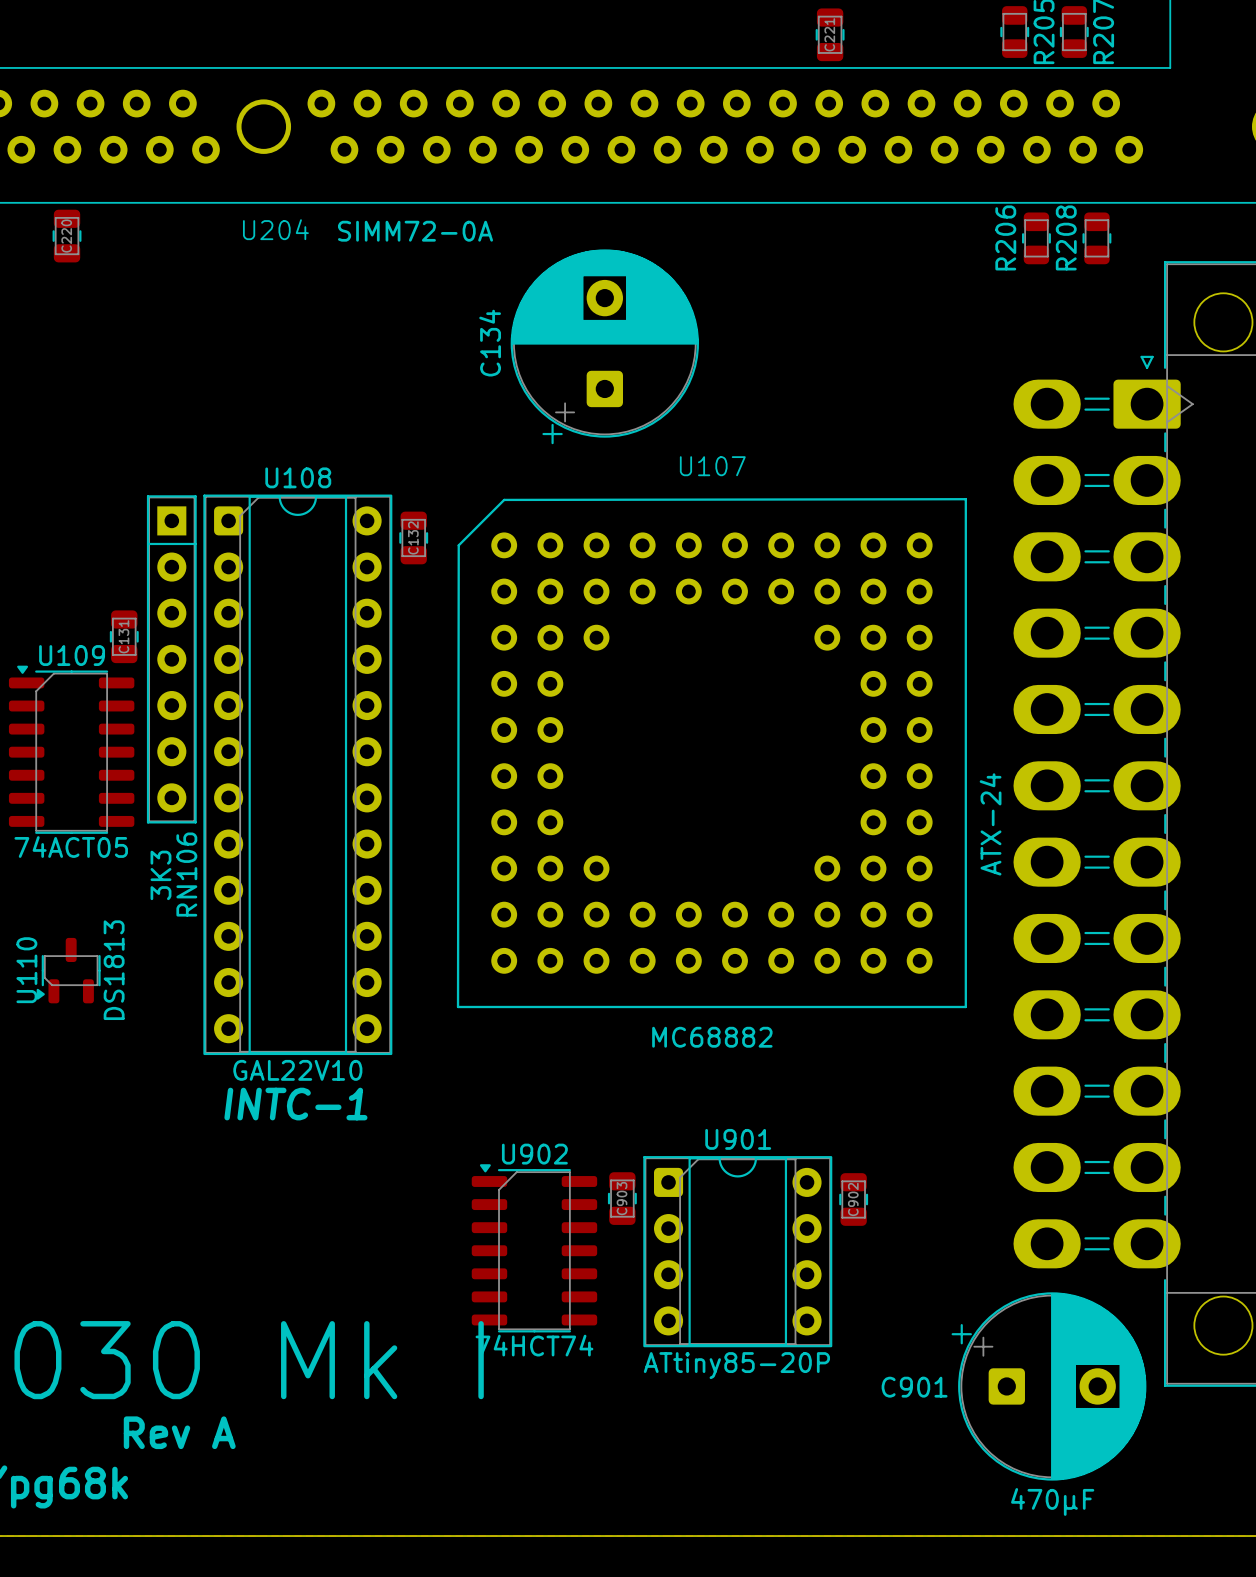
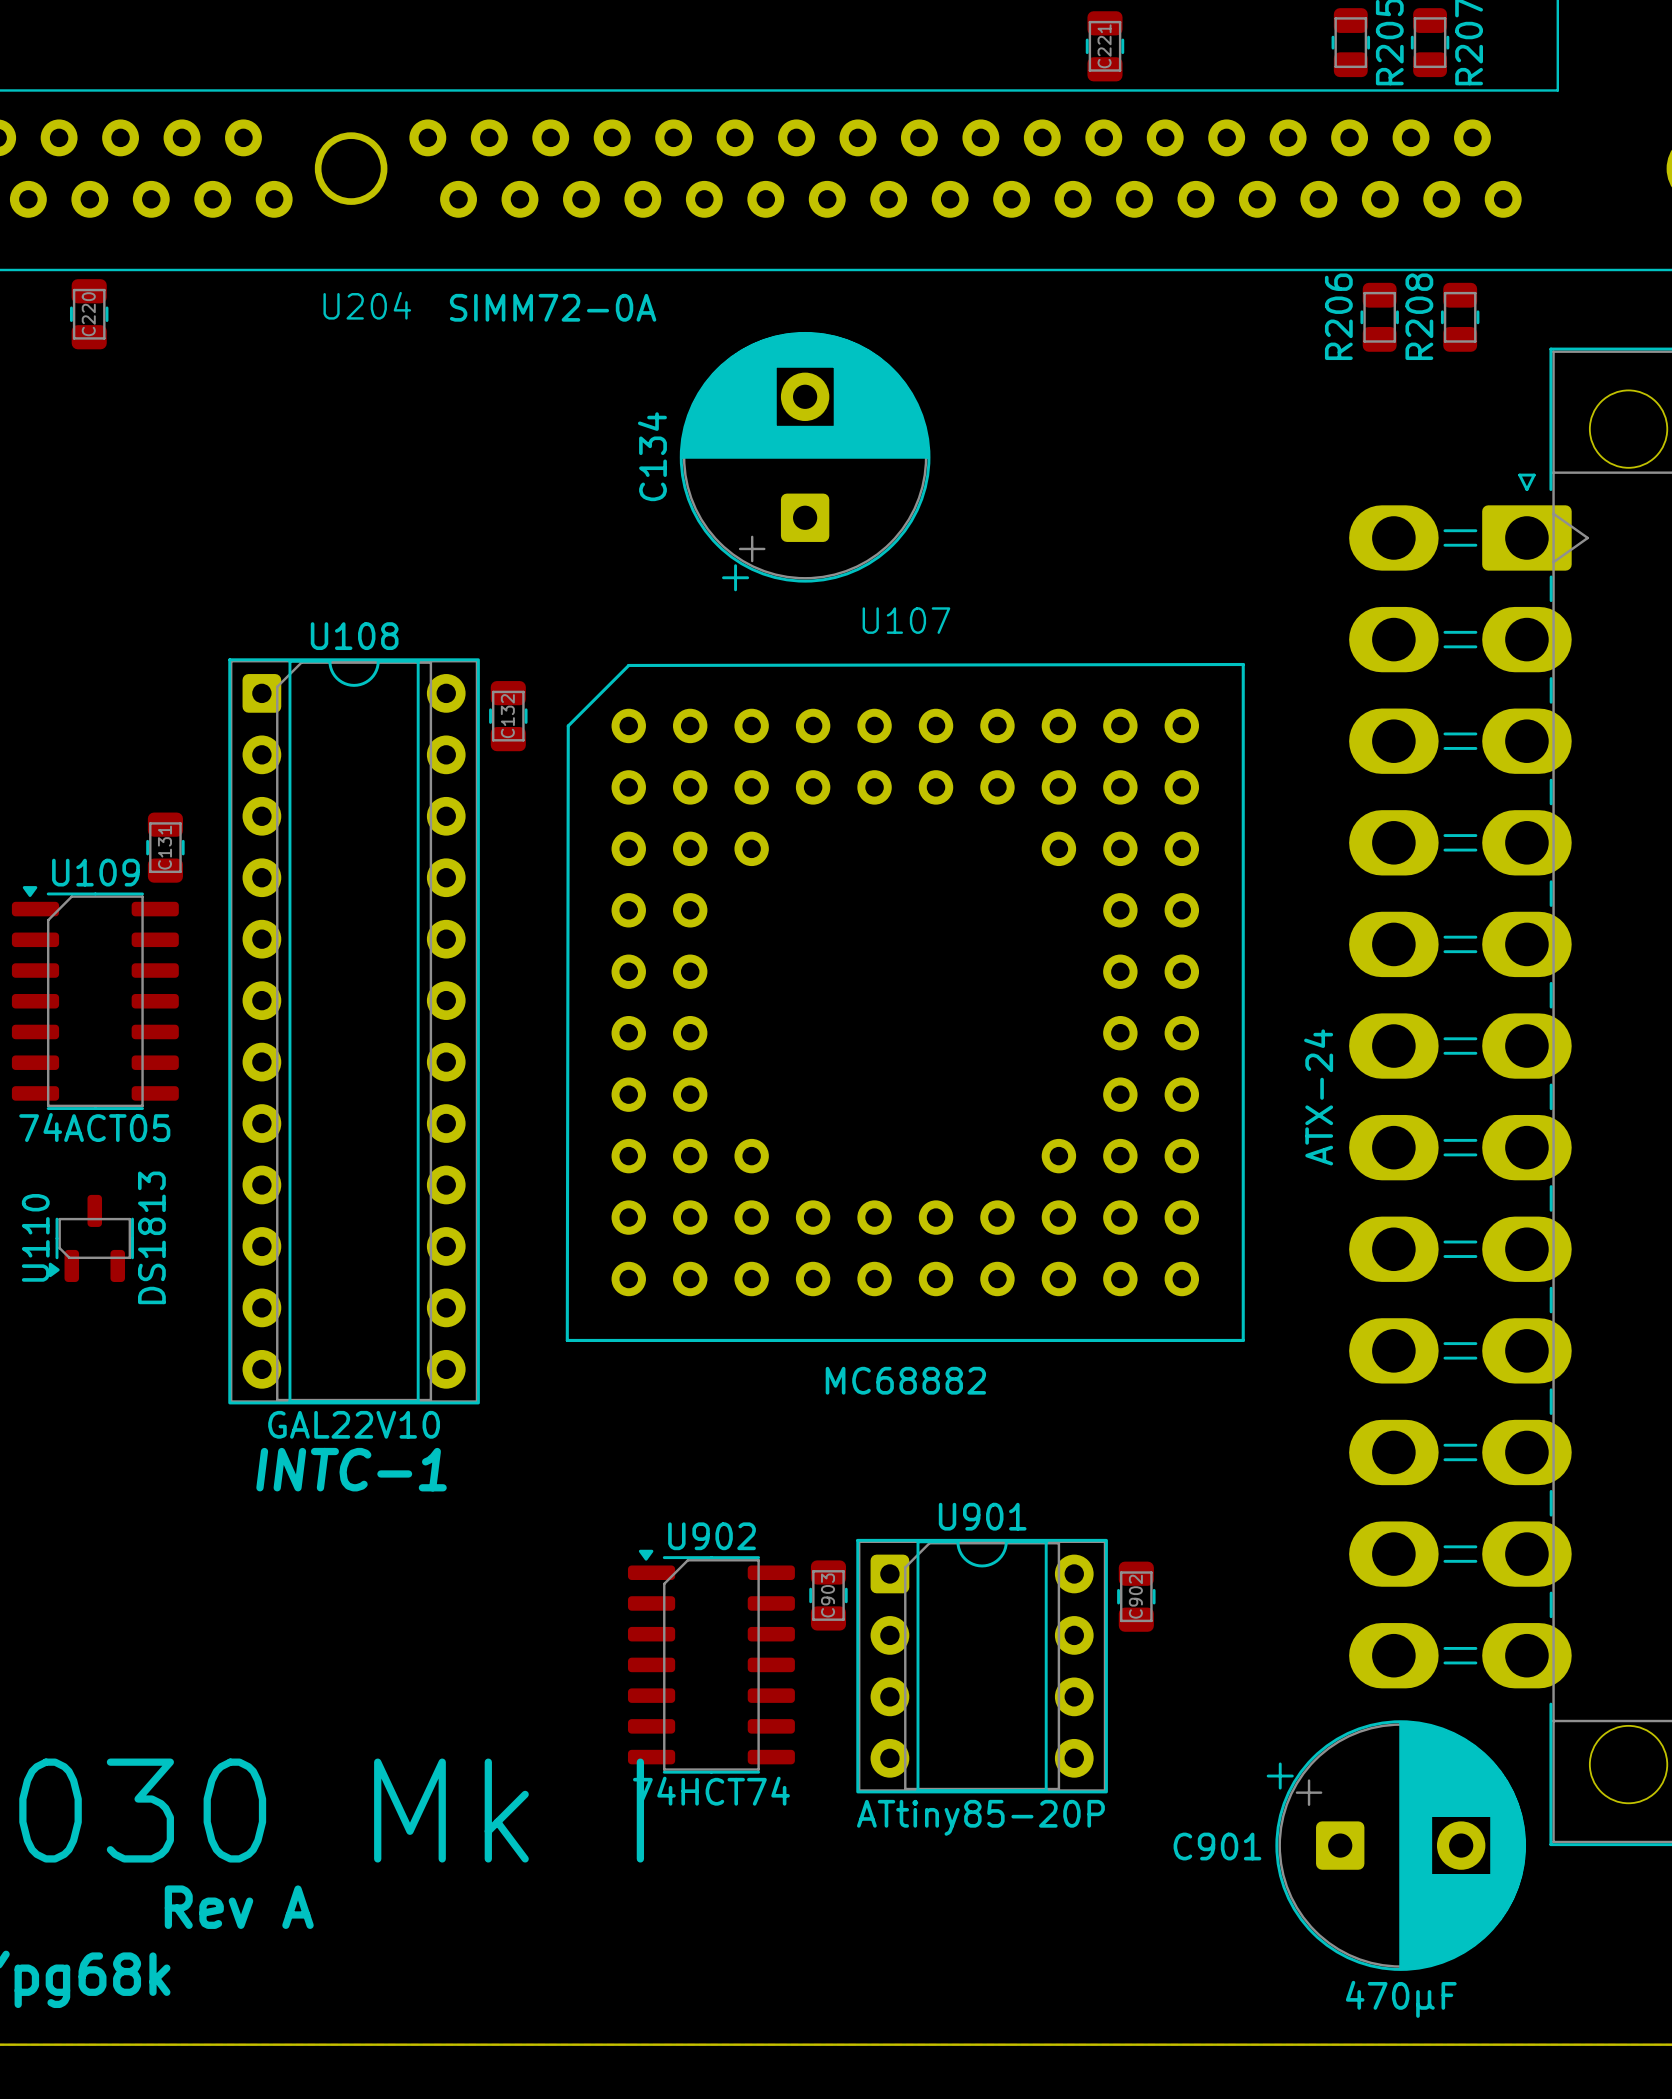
C132 position: (413, 537) -> (508, 716)
RN106: 3K3 (171, 659) -> none
U107 position: (711, 753) -> (905, 1002)
U108 position: (297, 774) -> (354, 1031)
U110 position: (68, 970) -> (91, 1238)
text position: INTC-1 (295, 1104) -> INTC-1 (351, 1469)

